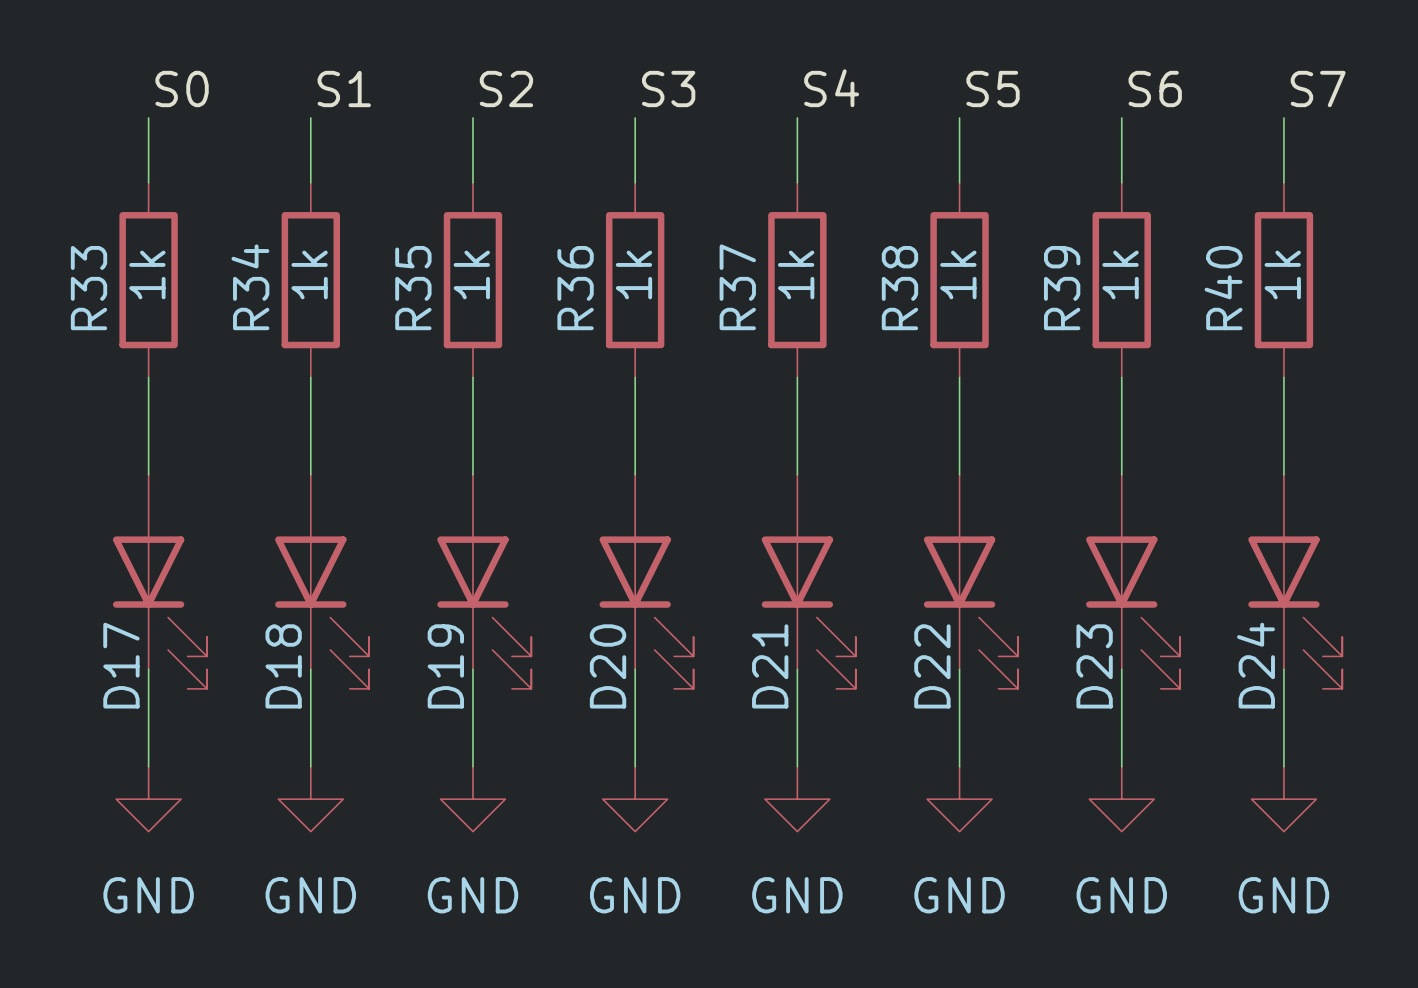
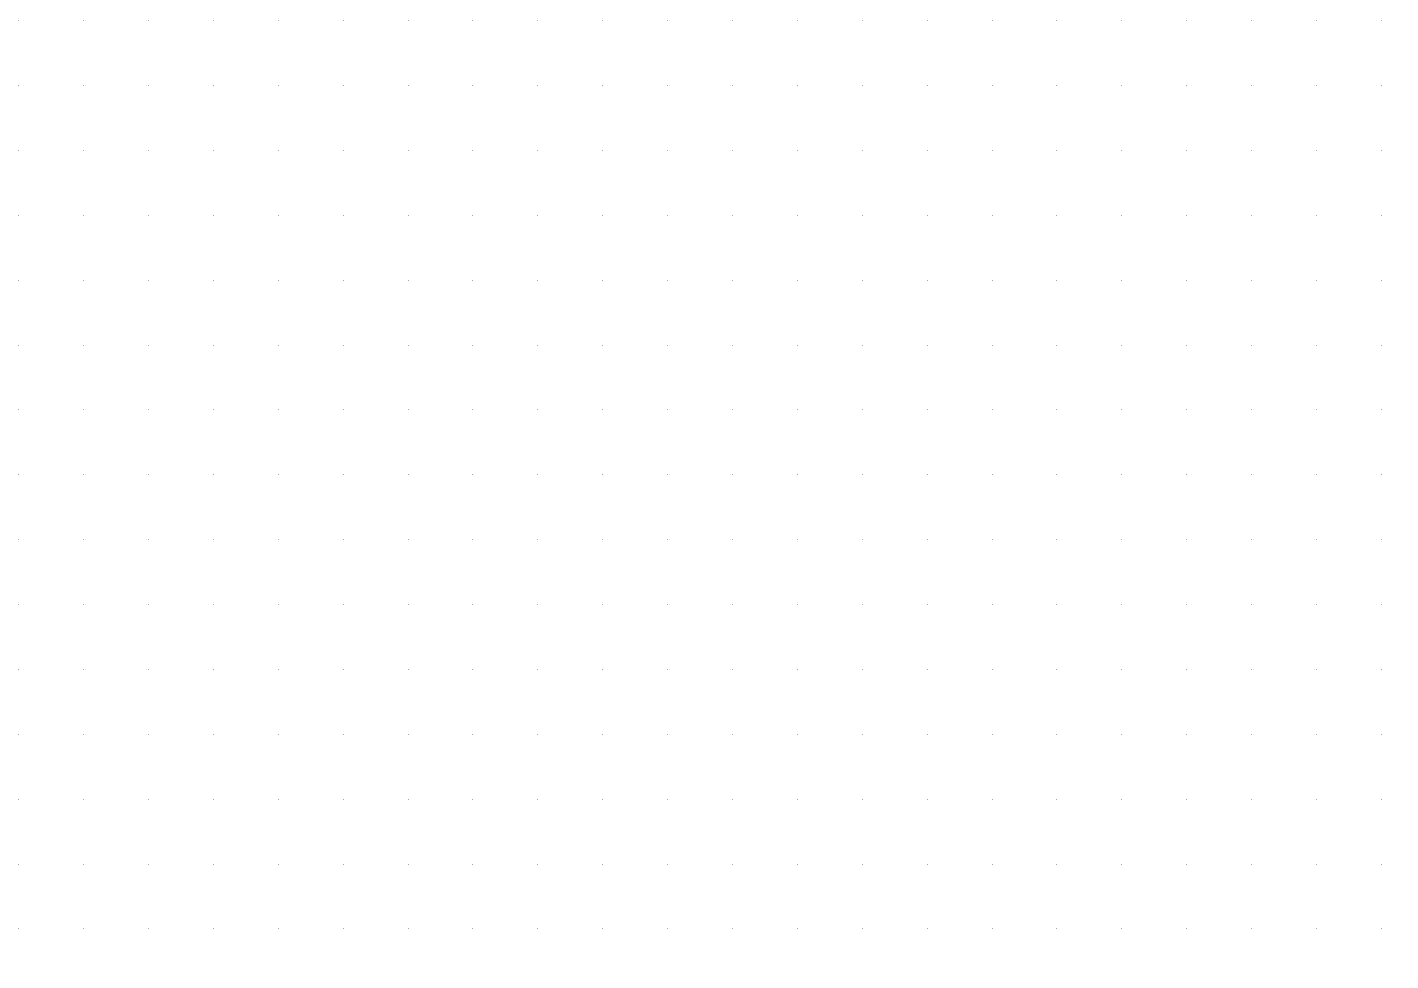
label: S4 (831, 88) -> none
label: S0 (182, 89) -> none
label: S1 (344, 89) -> none
label: S2 (506, 89) -> none
label: S3 (668, 89) -> none
label: S5 (993, 89) -> none
label: S6 (1155, 89) -> none
label: S7 (1318, 89) -> none
wire: (148, 117) (148, 182) -> none
wire: (310, 117) (310, 182) -> none
wire: (472, 117) (472, 182) -> none
wire: (635, 117) (635, 182) -> none
wire: (797, 117) (797, 182) -> none
wire: (959, 117) (959, 182) -> none
wire: (1121, 117) (1121, 182) -> none
wire: (1283, 117) (1283, 182) -> none
R33: 1k (148, 280) -> none
R34: 1k (310, 280) -> none
R35: 1k (472, 280) -> none
R36: 1k (635, 280) -> none
R37: 1k (797, 280) -> none
R38: 1k (959, 280) -> none
R39: 1k (1121, 280) -> none
R40: 1k (1283, 280) -> none
wire: (148, 377) (148, 474) -> none
wire: (310, 377) (310, 474) -> none
wire: (472, 377) (472, 474) -> none
wire: (635, 377) (635, 474) -> none
wire: (797, 377) (797, 474) -> none
wire: (959, 377) (959, 474) -> none
wire: (1121, 377) (1121, 474) -> none
wire: (1283, 377) (1283, 474) -> none
D17: (159, 581) -> none
D18: (322, 581) -> none
D19: (484, 581) -> none
D20: (646, 581) -> none
D21: (808, 581) -> none
D22: (970, 581) -> none
D23: (1133, 581) -> none
D24: (1295, 581) -> none
wire: (148, 669) (148, 766) -> none
wire: (310, 669) (310, 766) -> none
wire: (472, 669) (472, 766) -> none
wire: (635, 669) (635, 766) -> none
wire: (797, 669) (797, 766) -> none
wire: (959, 669) (959, 766) -> none
wire: (1121, 669) (1121, 766) -> none
wire: (1283, 669) (1283, 766) -> none
power symbol: GND (148, 799) -> none
power symbol: GND (310, 799) -> none
power symbol: GND (472, 799) -> none
power symbol: GND (635, 799) -> none
power symbol: GND (797, 799) -> none
power symbol: GND (959, 799) -> none
power symbol: GND (1121, 799) -> none
power symbol: GND (1283, 799) -> none

